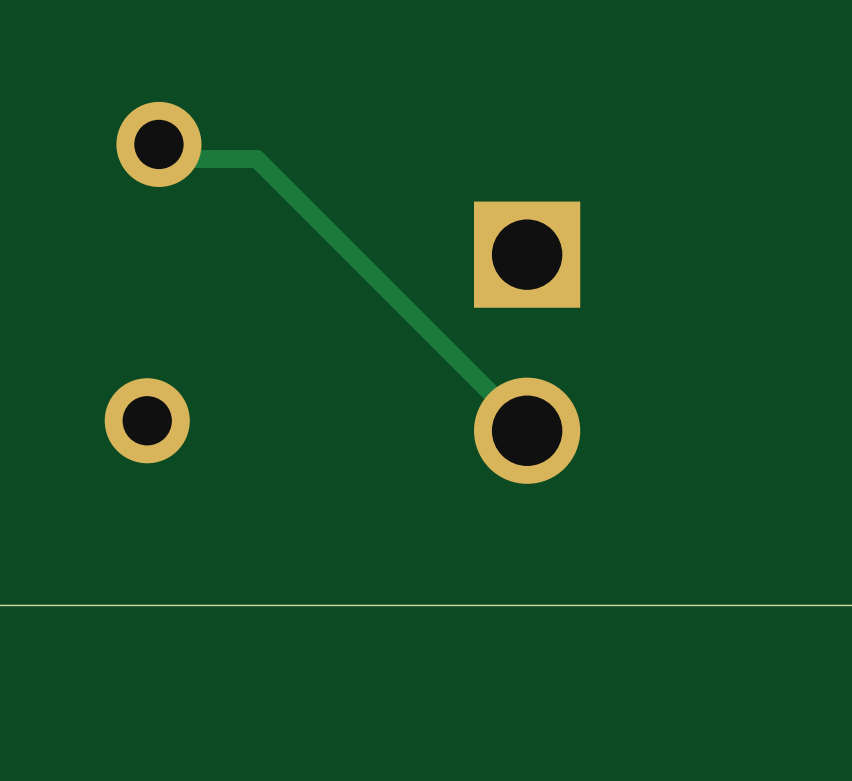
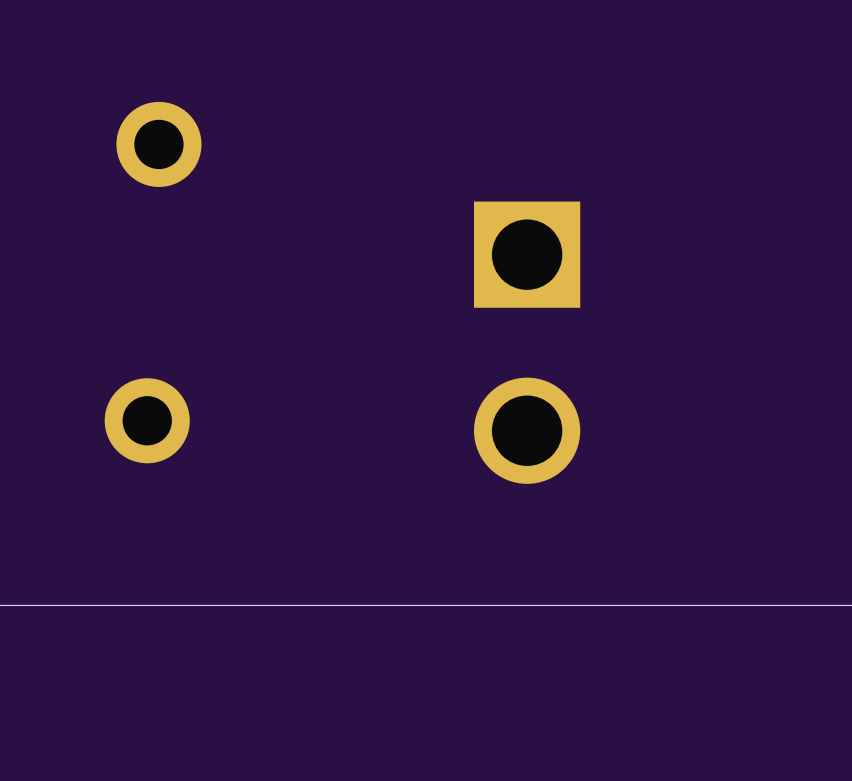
track: (158, 144) (160, 159) (256, 159) (527, 430) -> none

